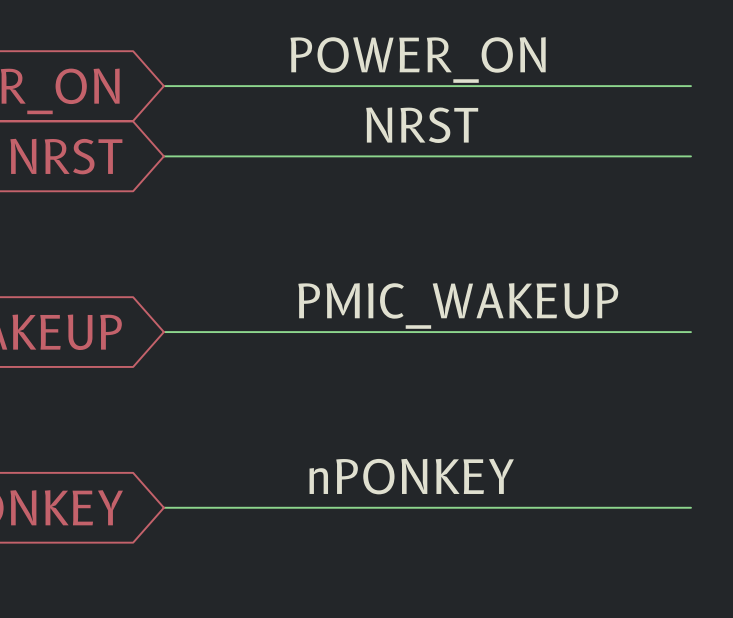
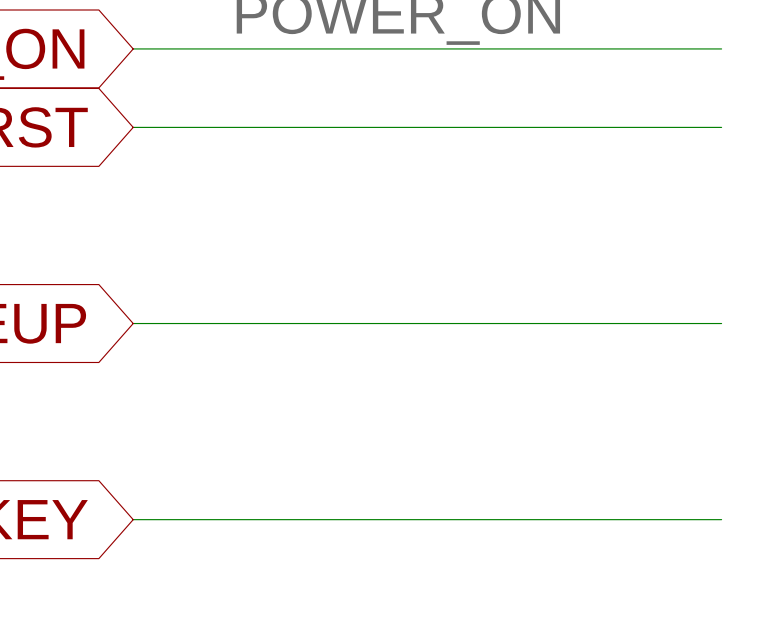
label: NRST (422, 125) -> none
label: PMIC_WAKEUP (458, 305) -> none
label: nPONKEY (411, 476) -> none

